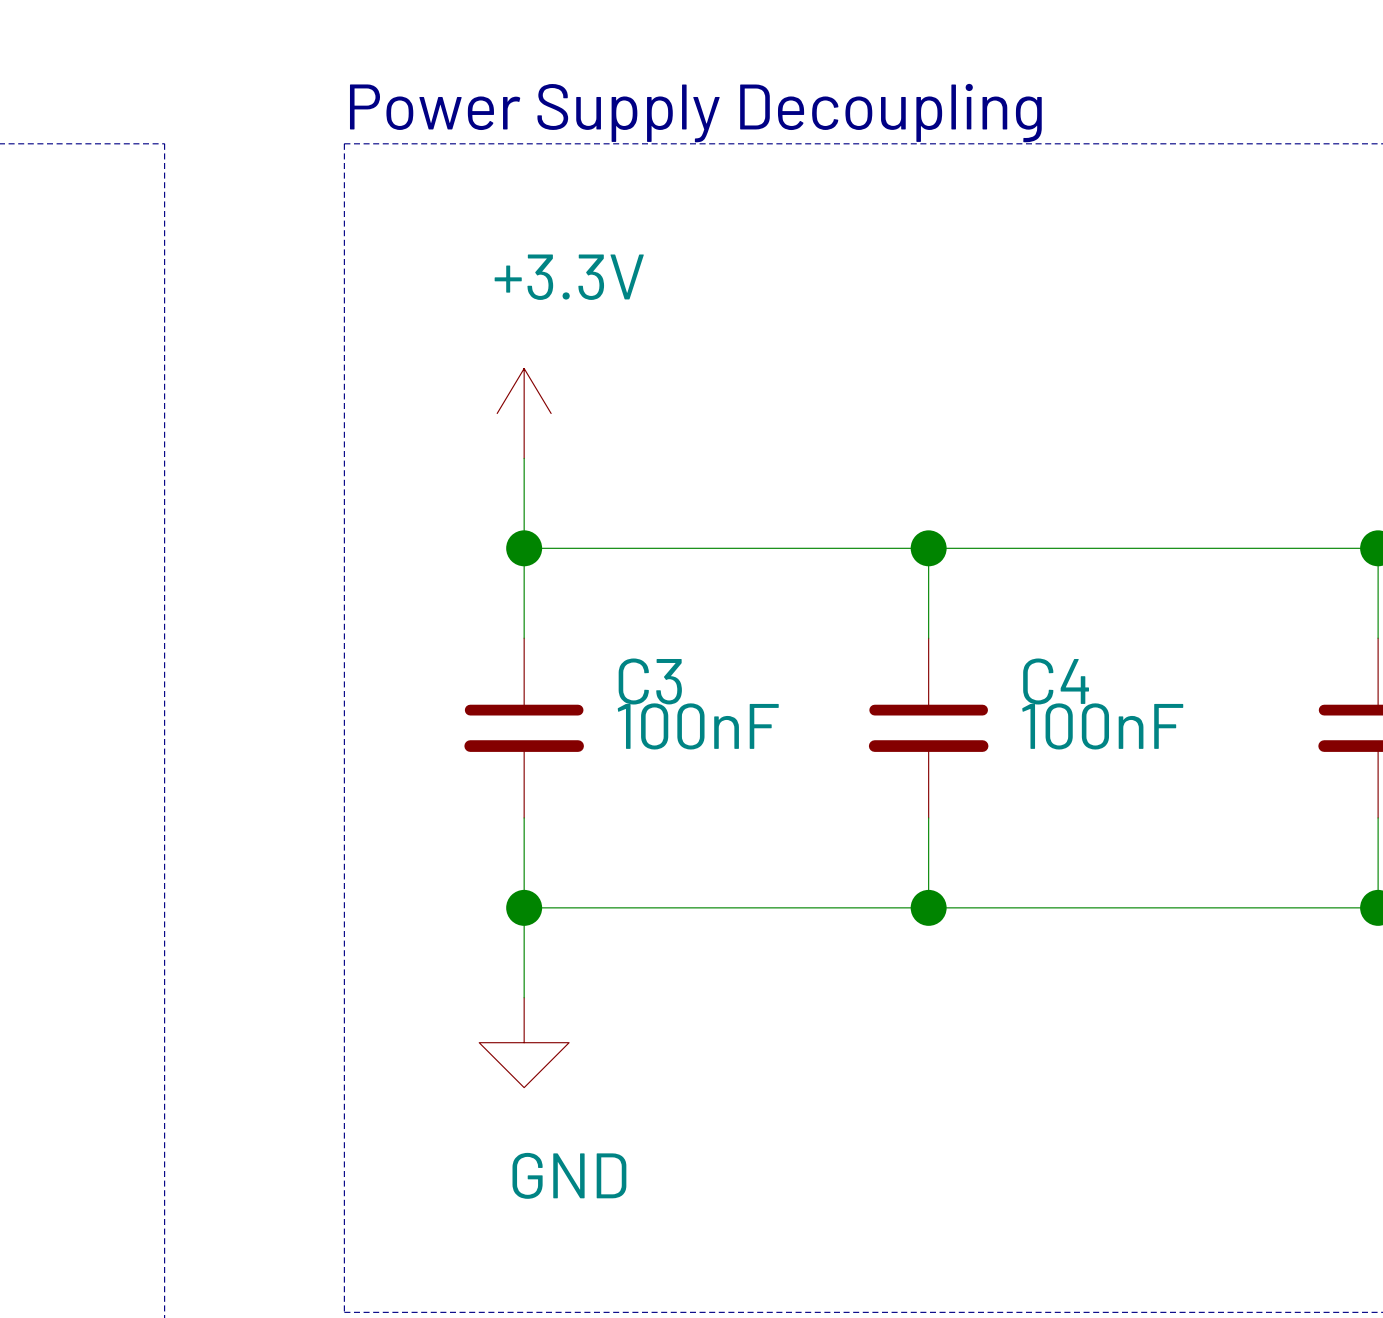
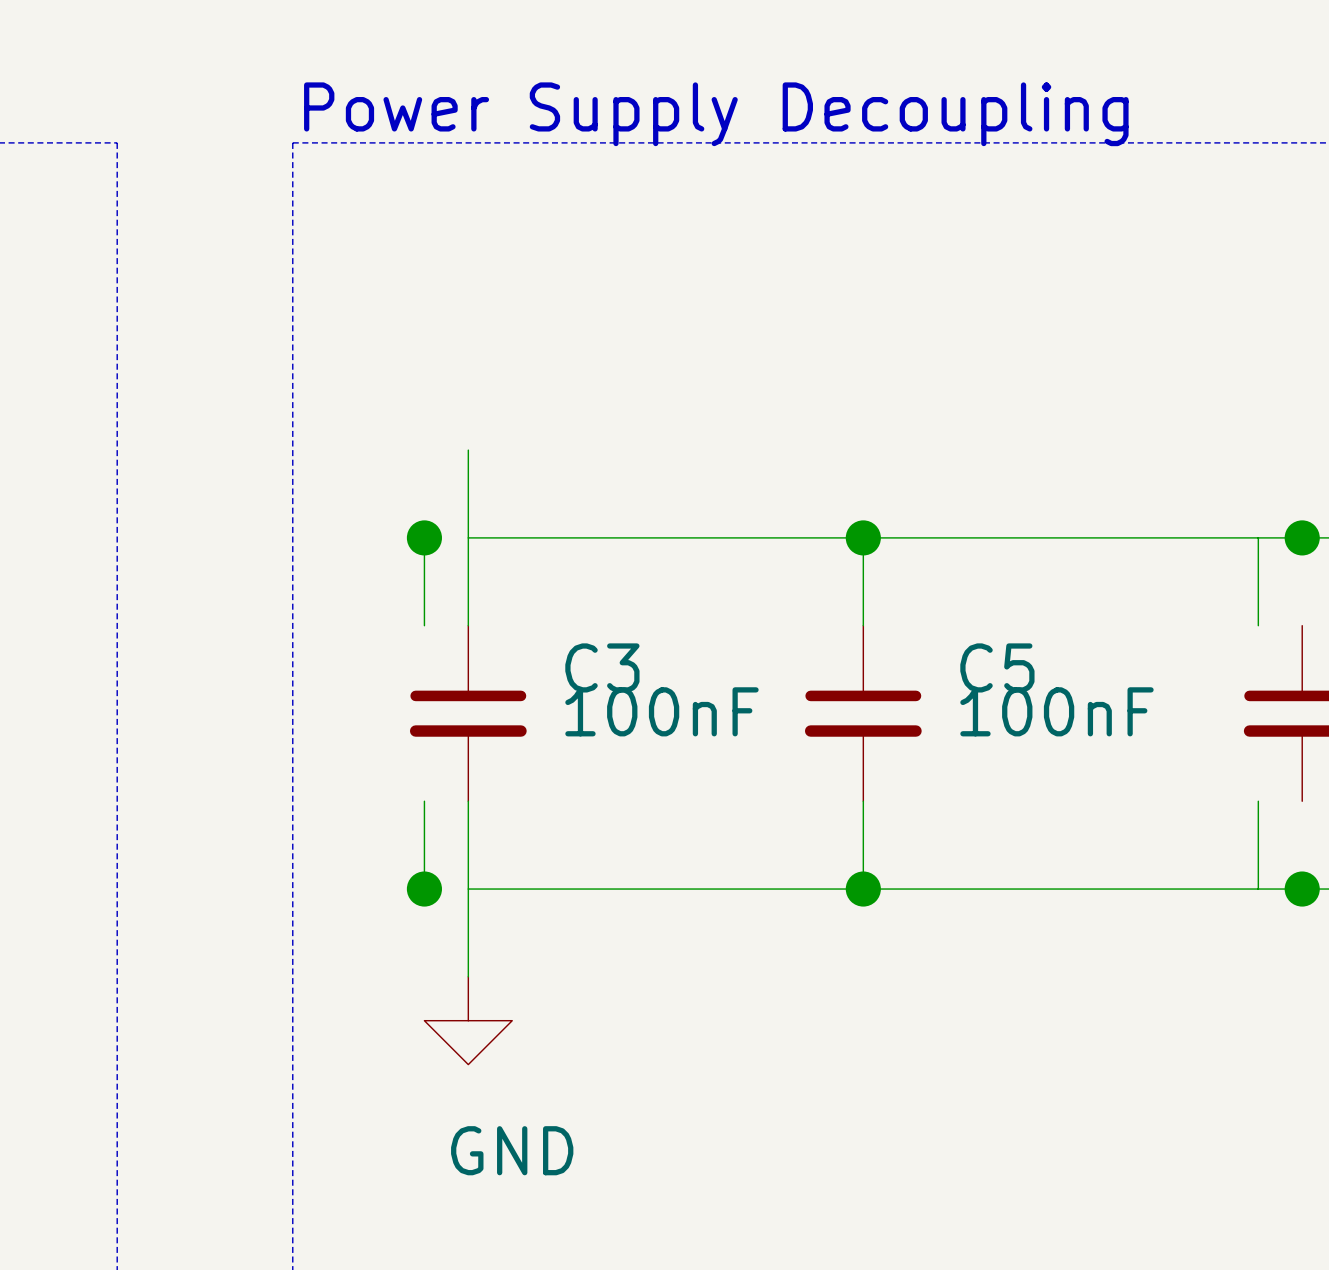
power symbol: +3.3V (524, 413) -> none
wire: none -> (424, 537) (424, 625)
junction position: (524, 548) -> (424, 537)
wire: (1378, 548) (1378, 638) -> (1258, 537) (1258, 625)
C4 name: C4 (1056, 681) -> C5 (997, 667)
wire: none -> (424, 801) (424, 889)
wire: (1378, 817) (1378, 907) -> (1258, 801) (1258, 889)
junction position: (524, 907) -> (424, 889)

